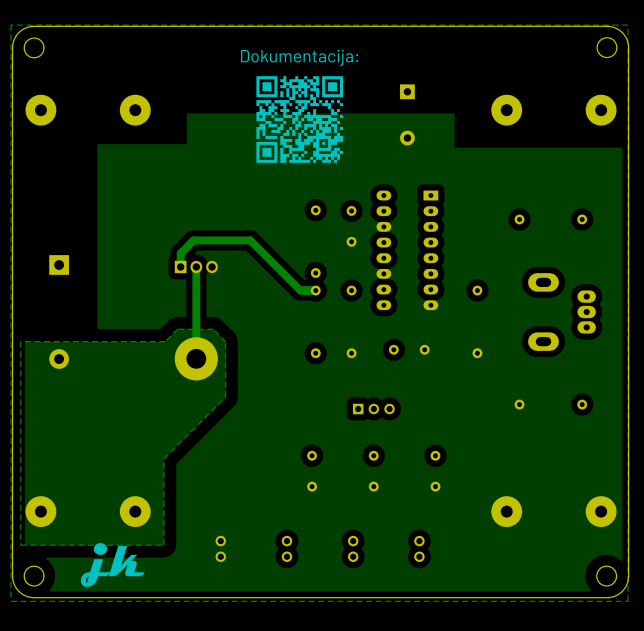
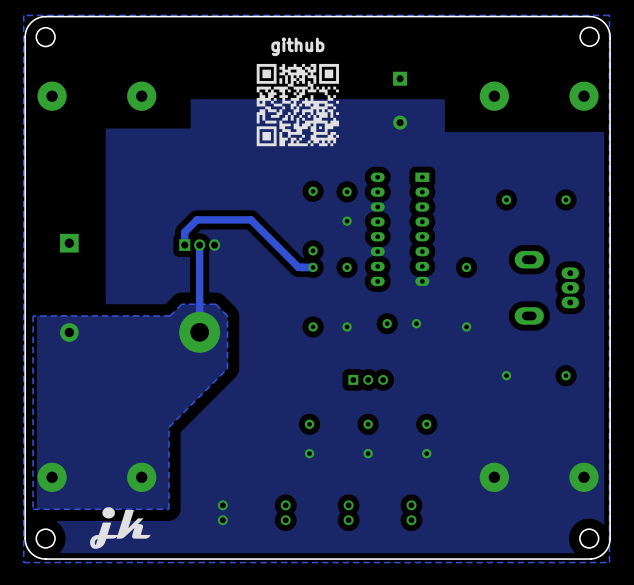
text: Dokumentacija: (299, 57) -> github (297, 46)

